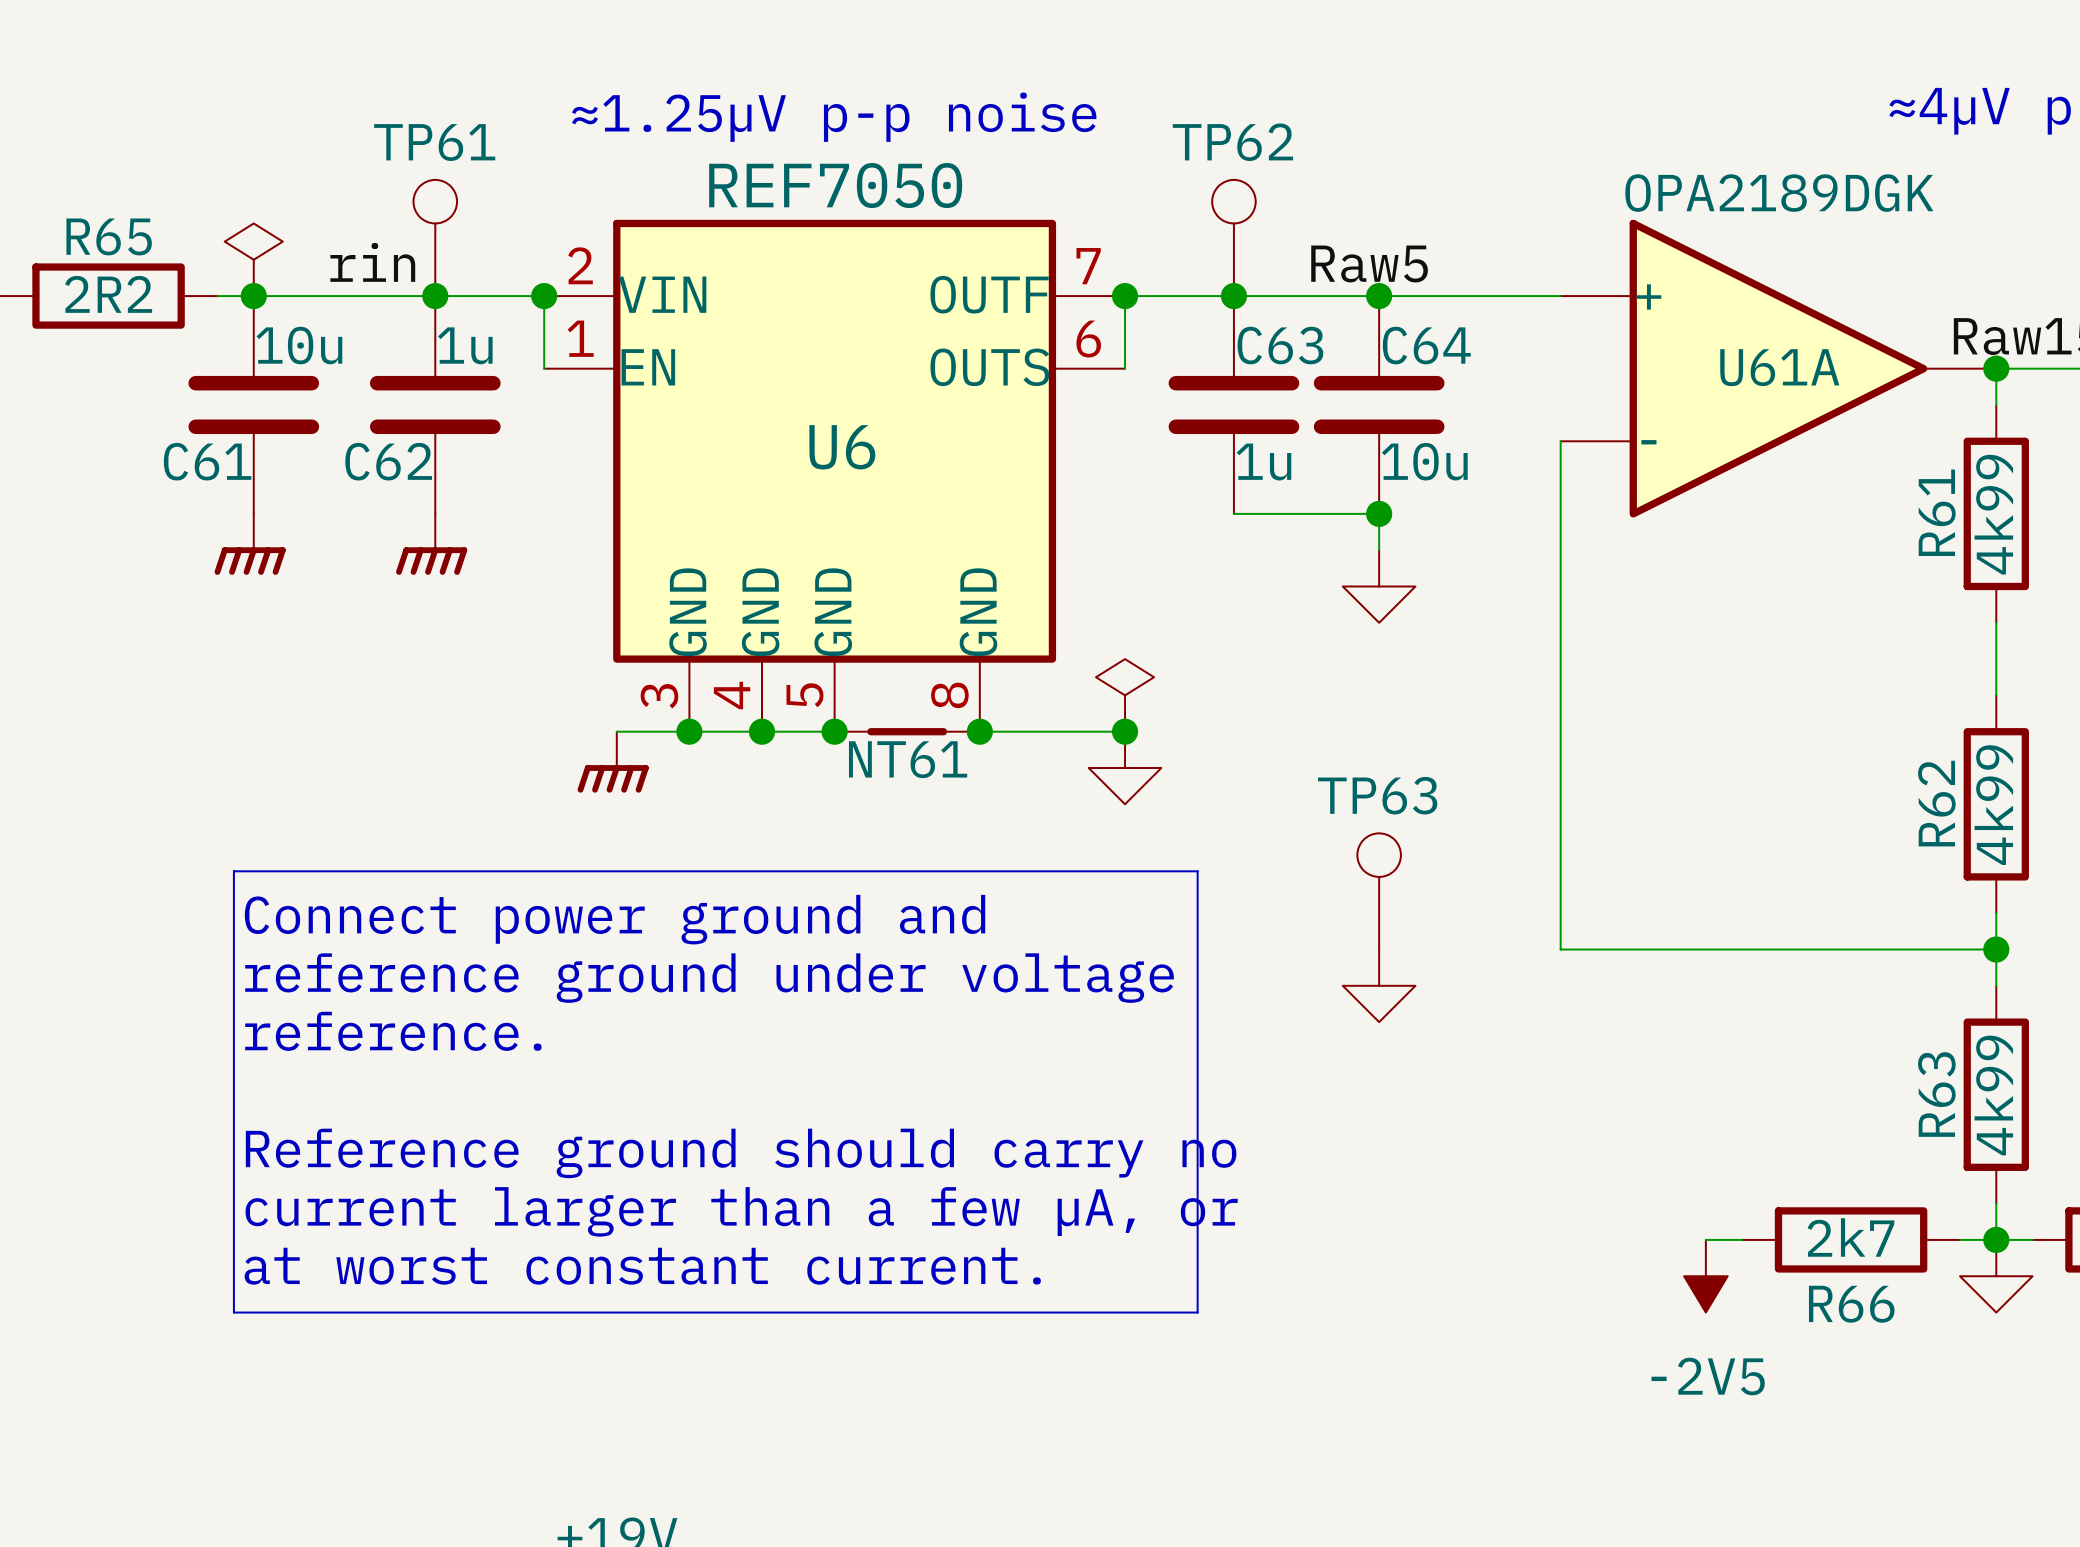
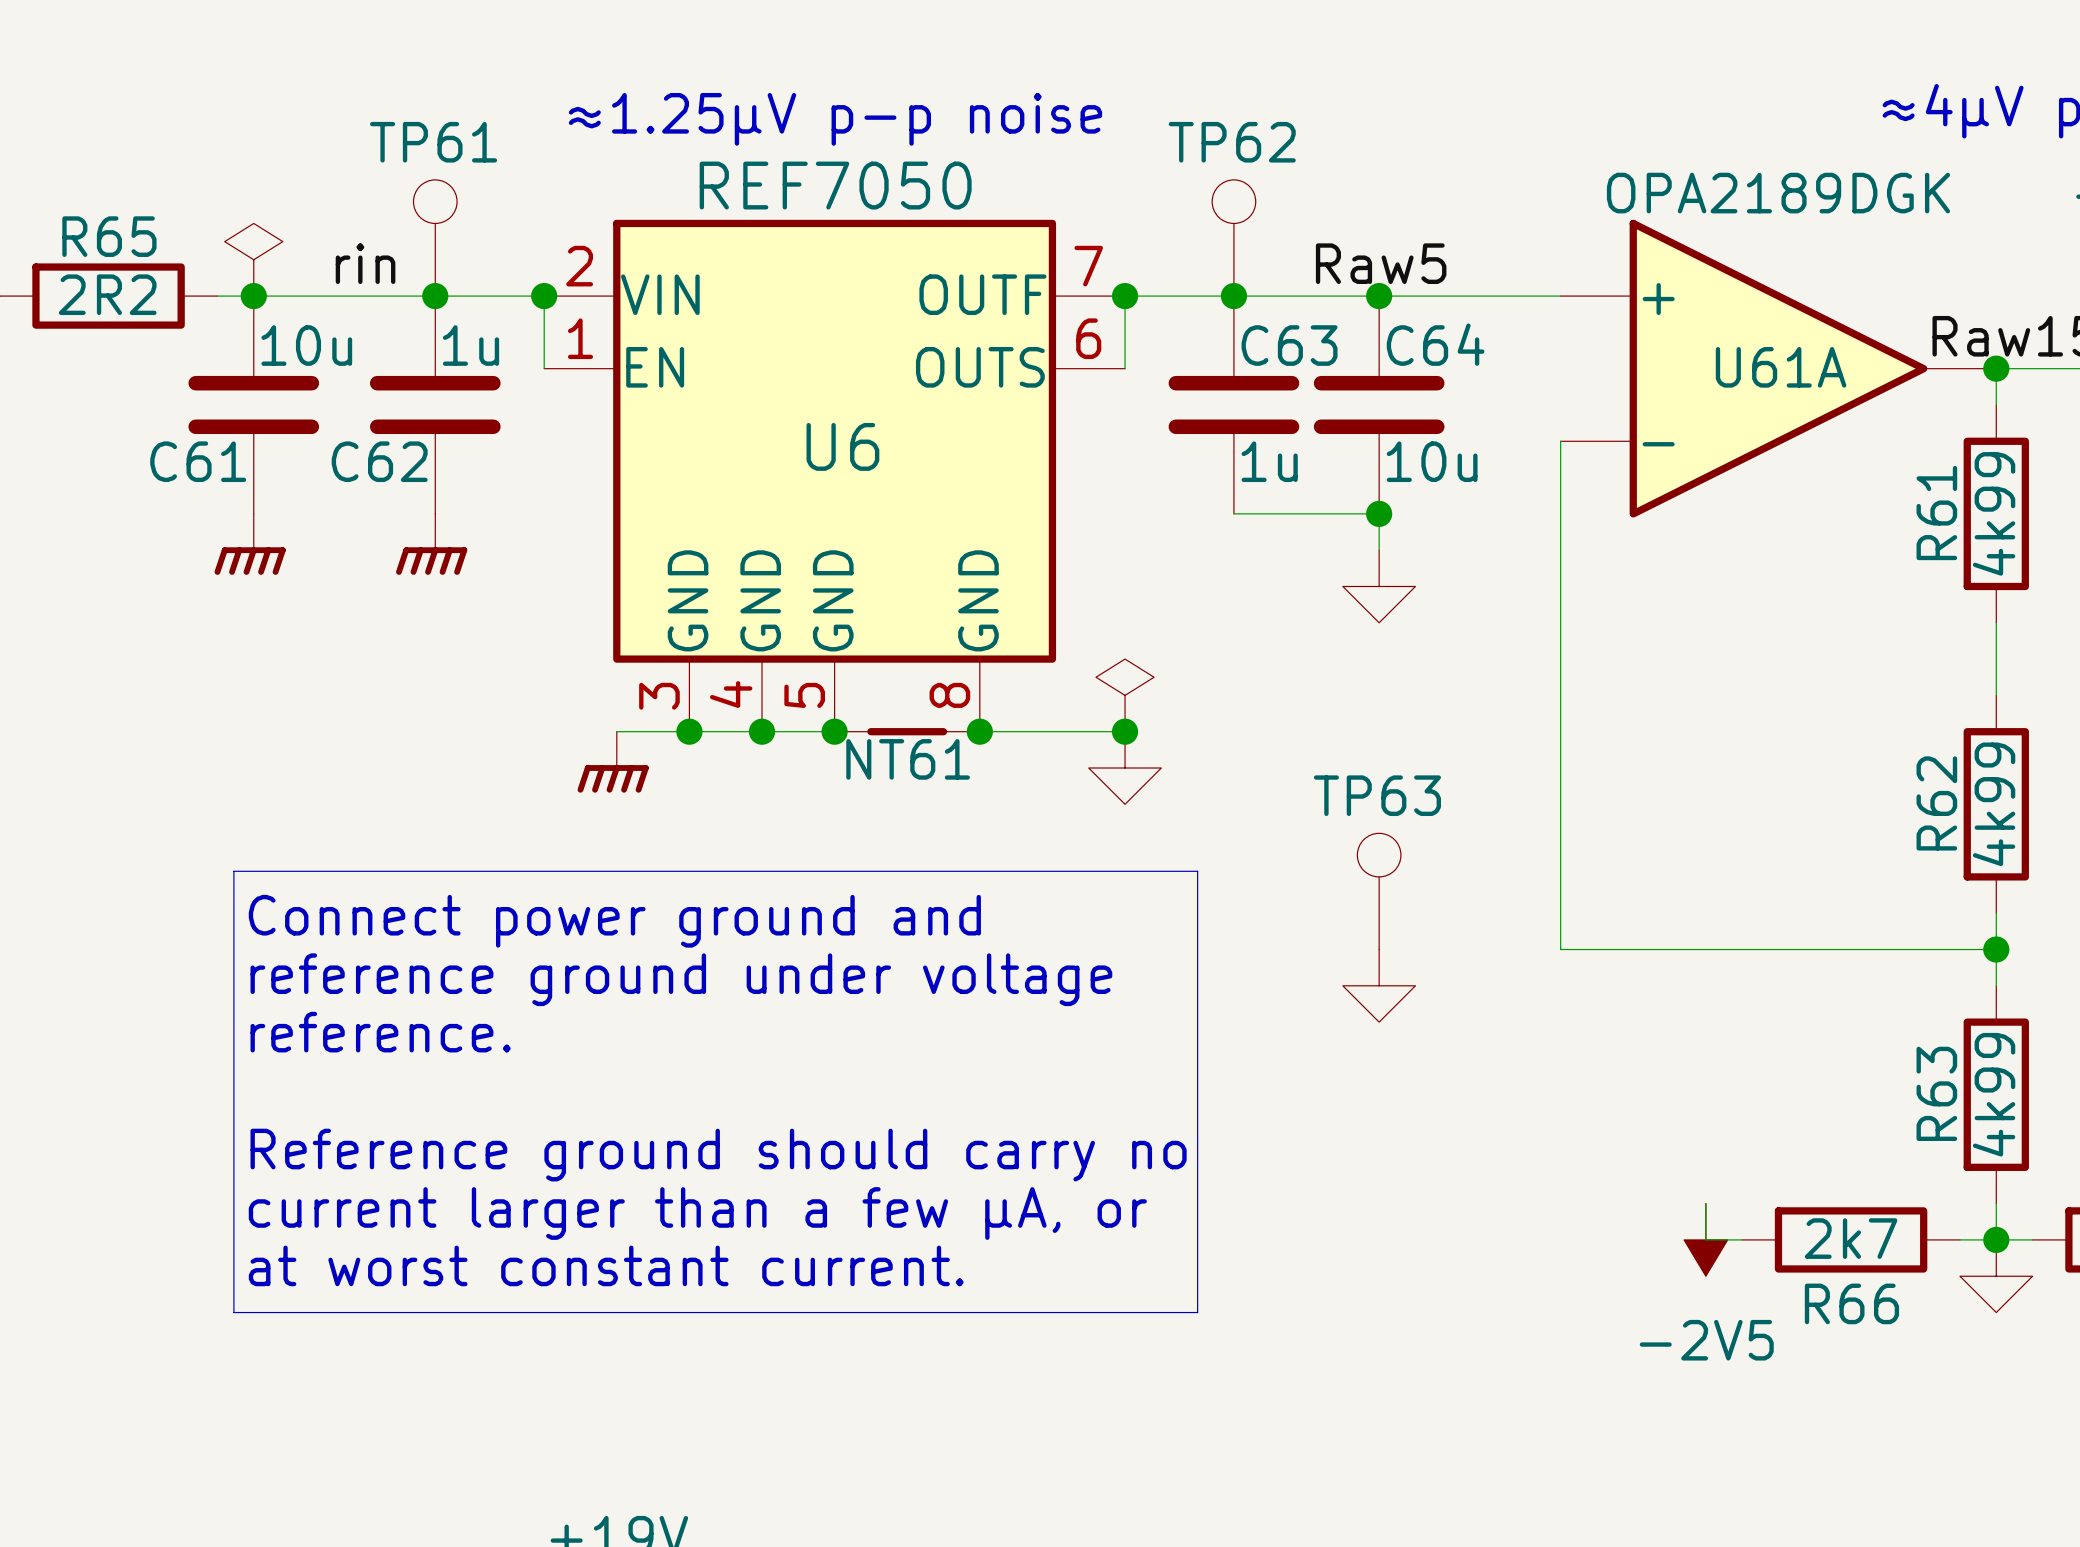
wire: none -> (1705, 1203) (1705, 1239)
power symbol position: -2V5 (1705, 1276) -> -2V5 (1705, 1239)

